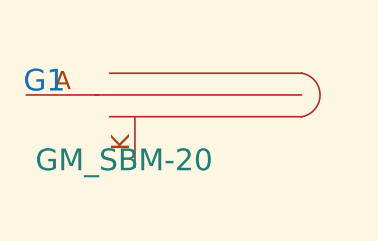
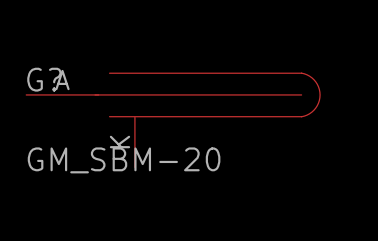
G1 name: G1 (43, 79) -> G? (44, 79)

